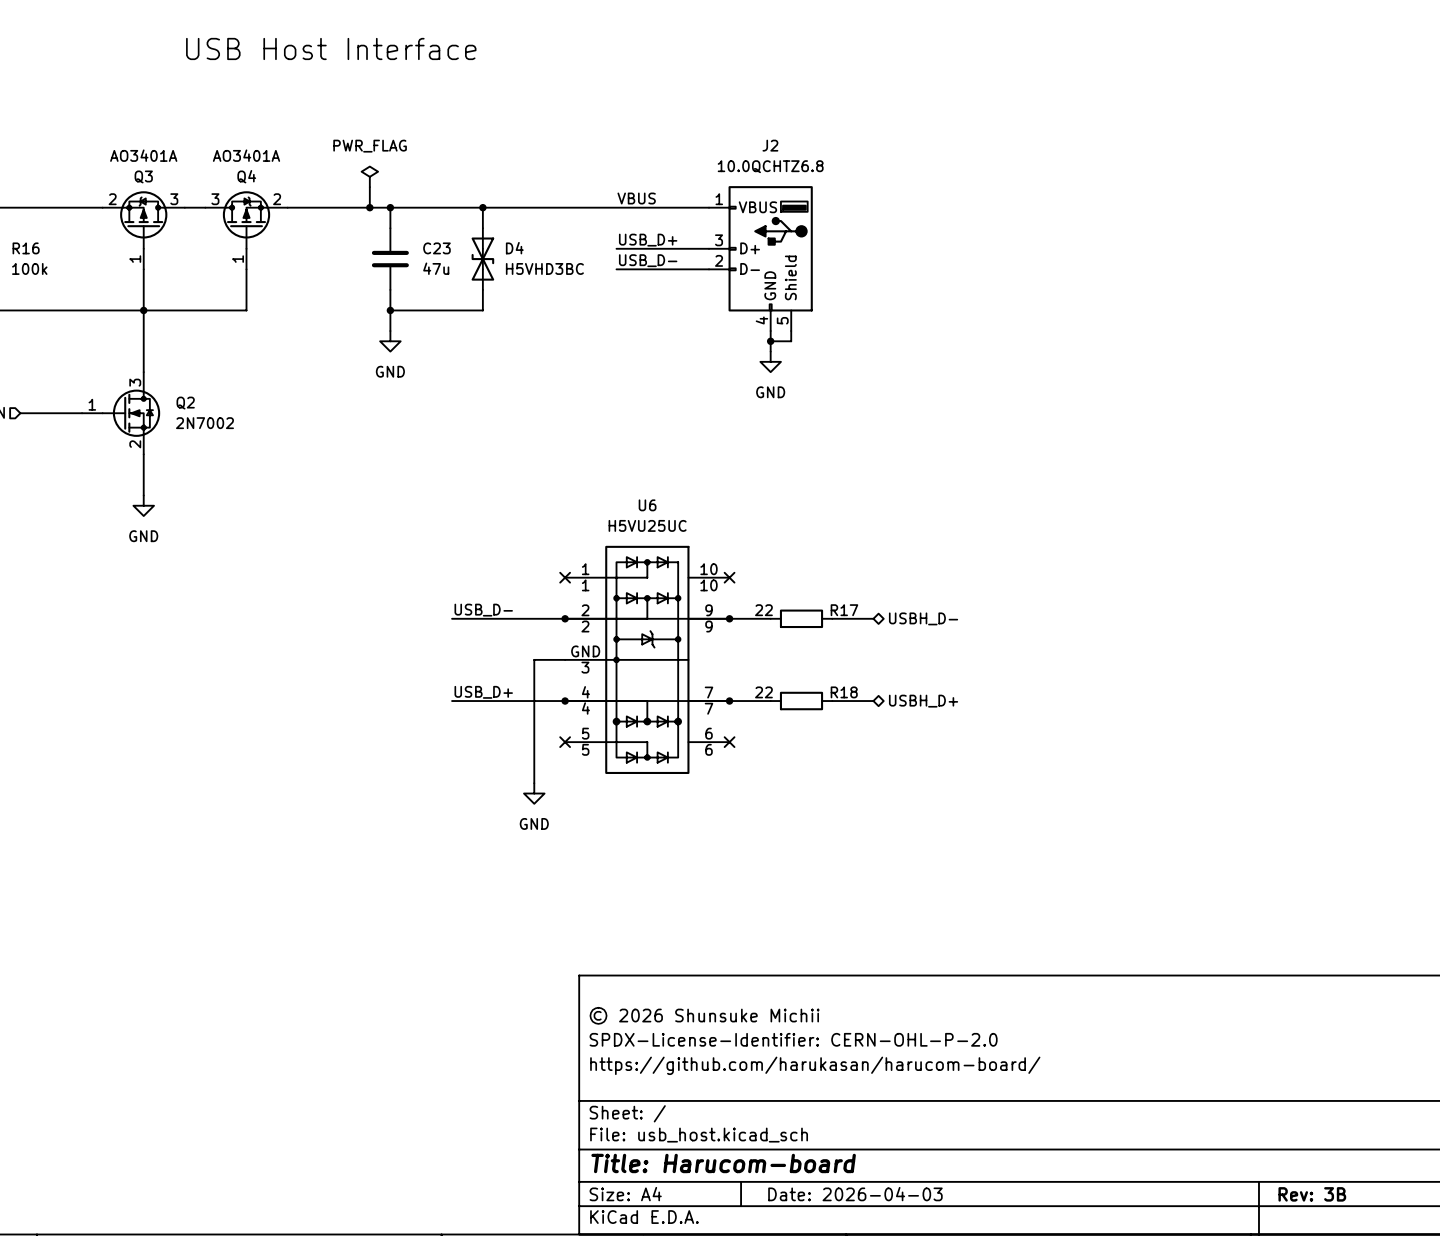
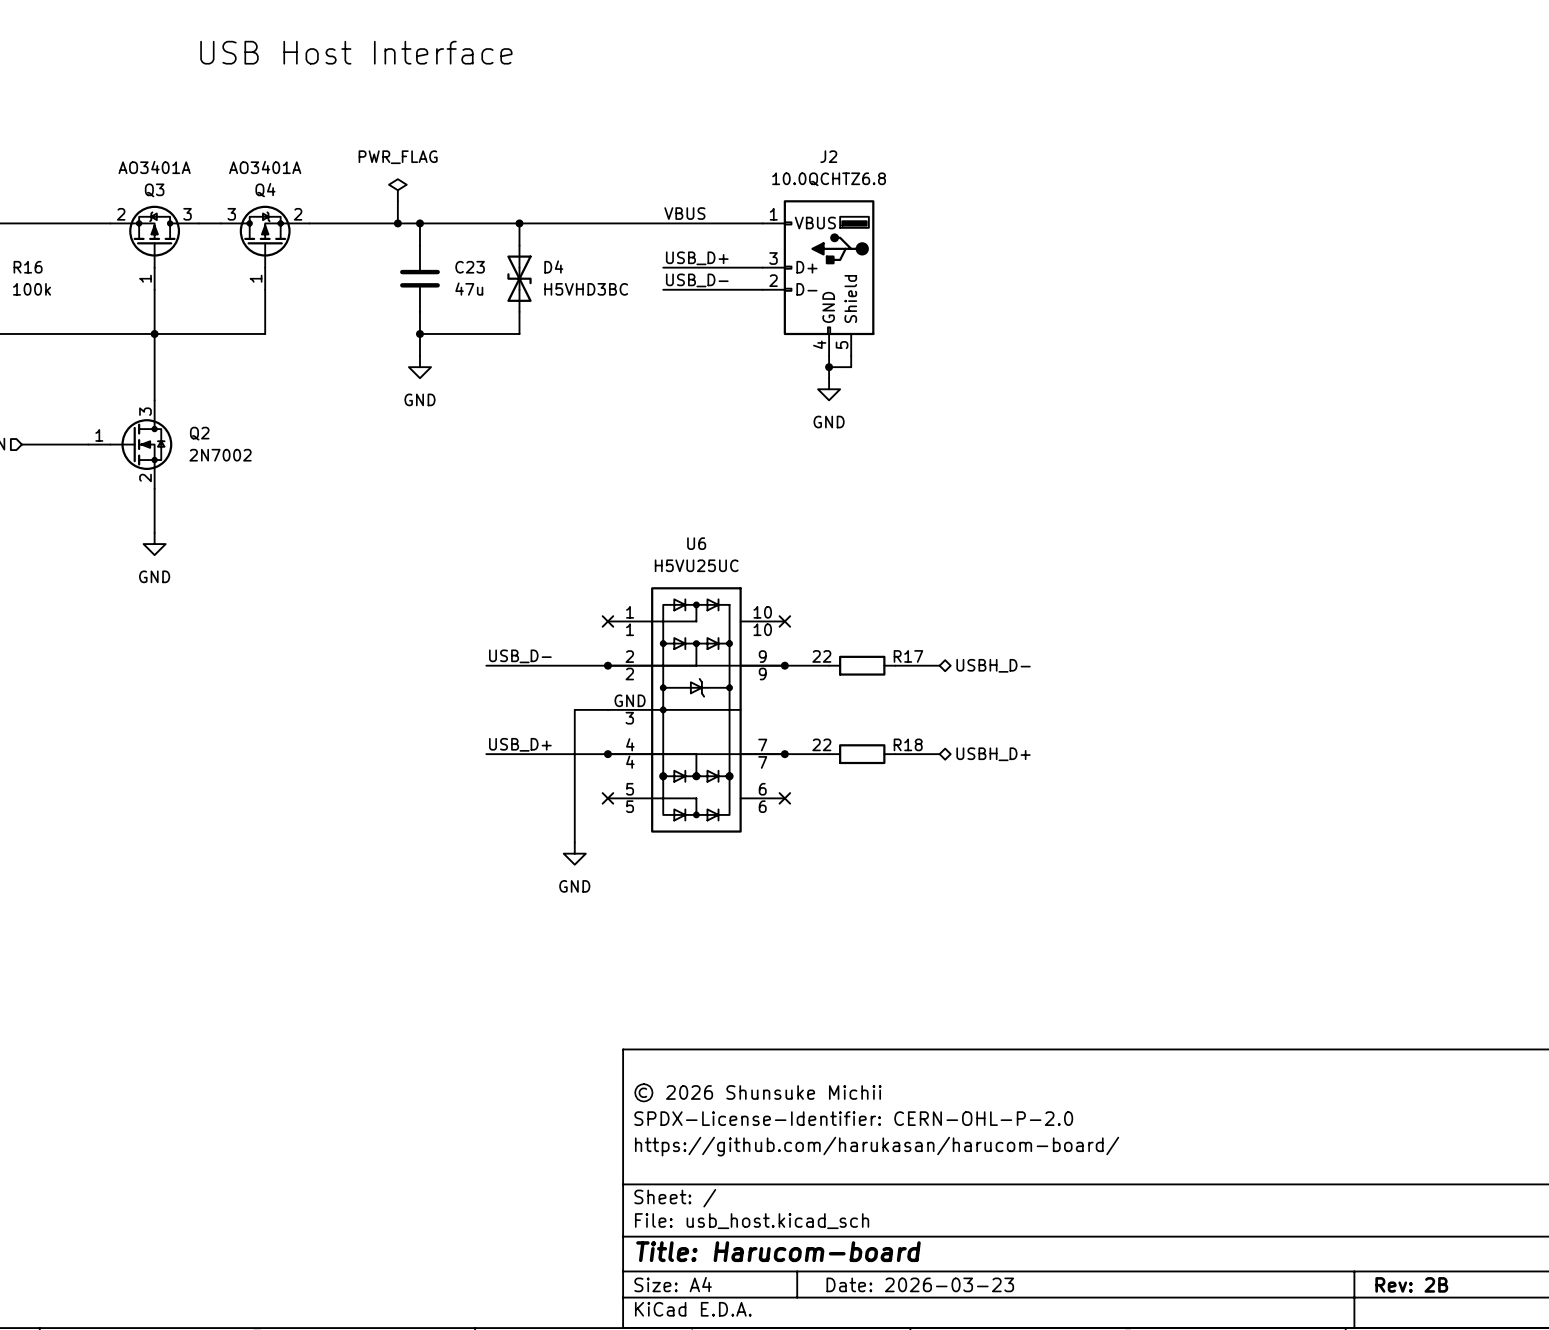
title block: Date: 2026-04-03 (855, 1194) -> Date: 2026-03-23 (920, 1284)
title block: Rev: 3B (1312, 1194) -> Rev: 2B (1411, 1284)

